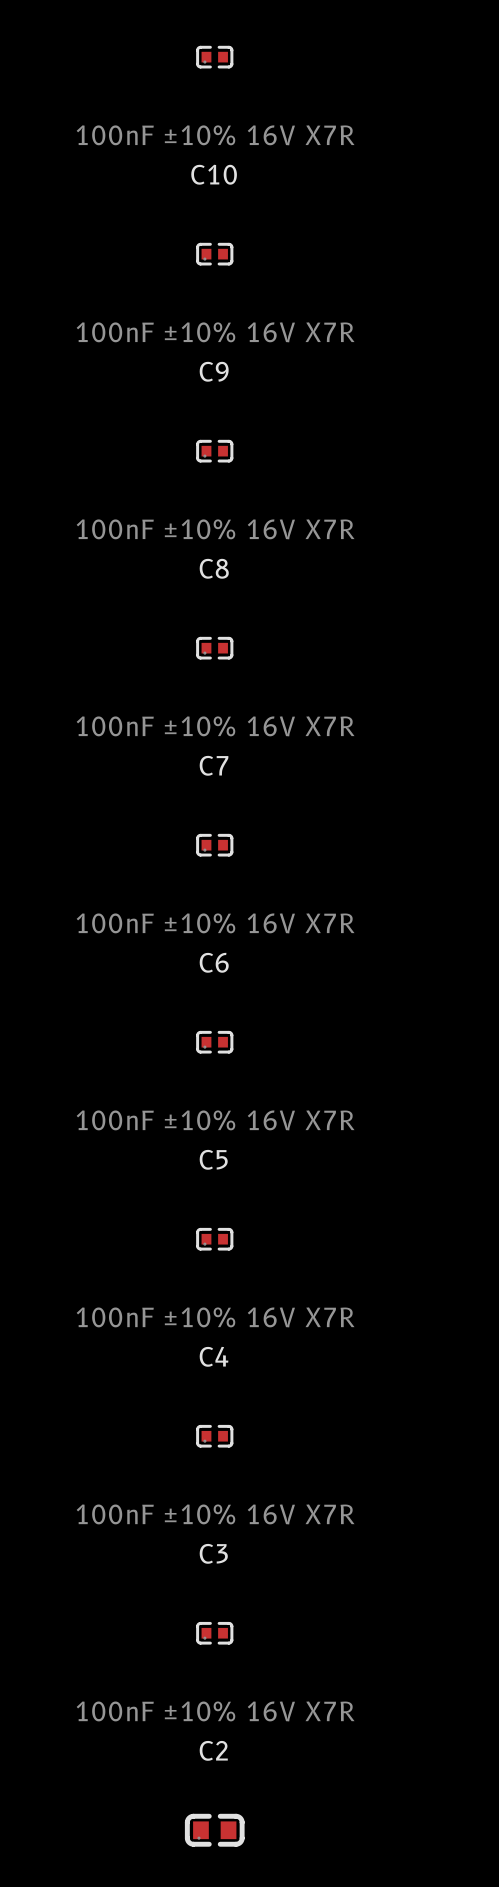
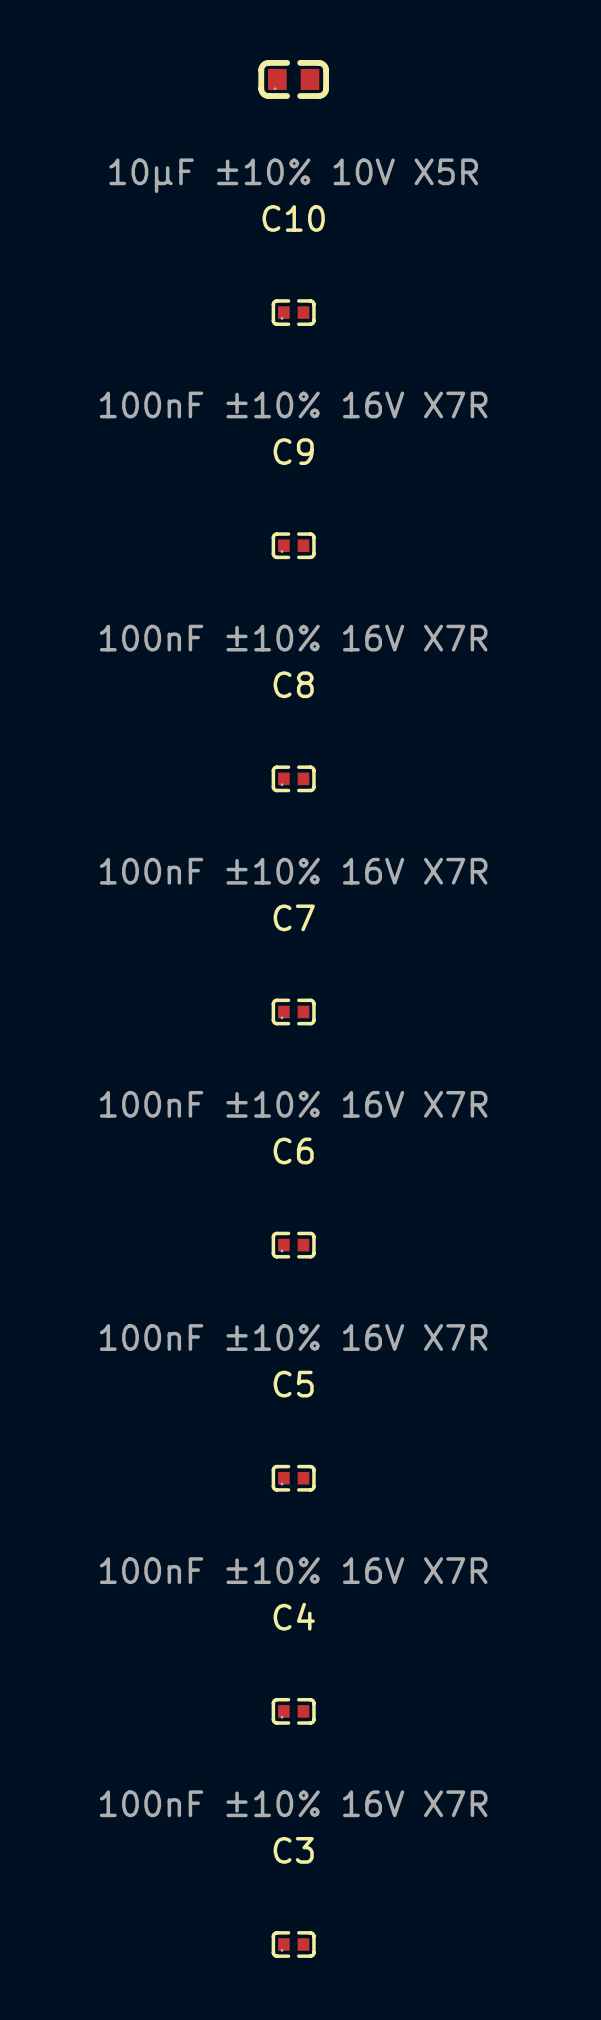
part footprint: [196, 45, 234, 69] -> [258, 59, 329, 99]
part value: 100nF ±10% 16V X7R (215, 135) -> 10µF ±10% 10V X5R (293, 175)

